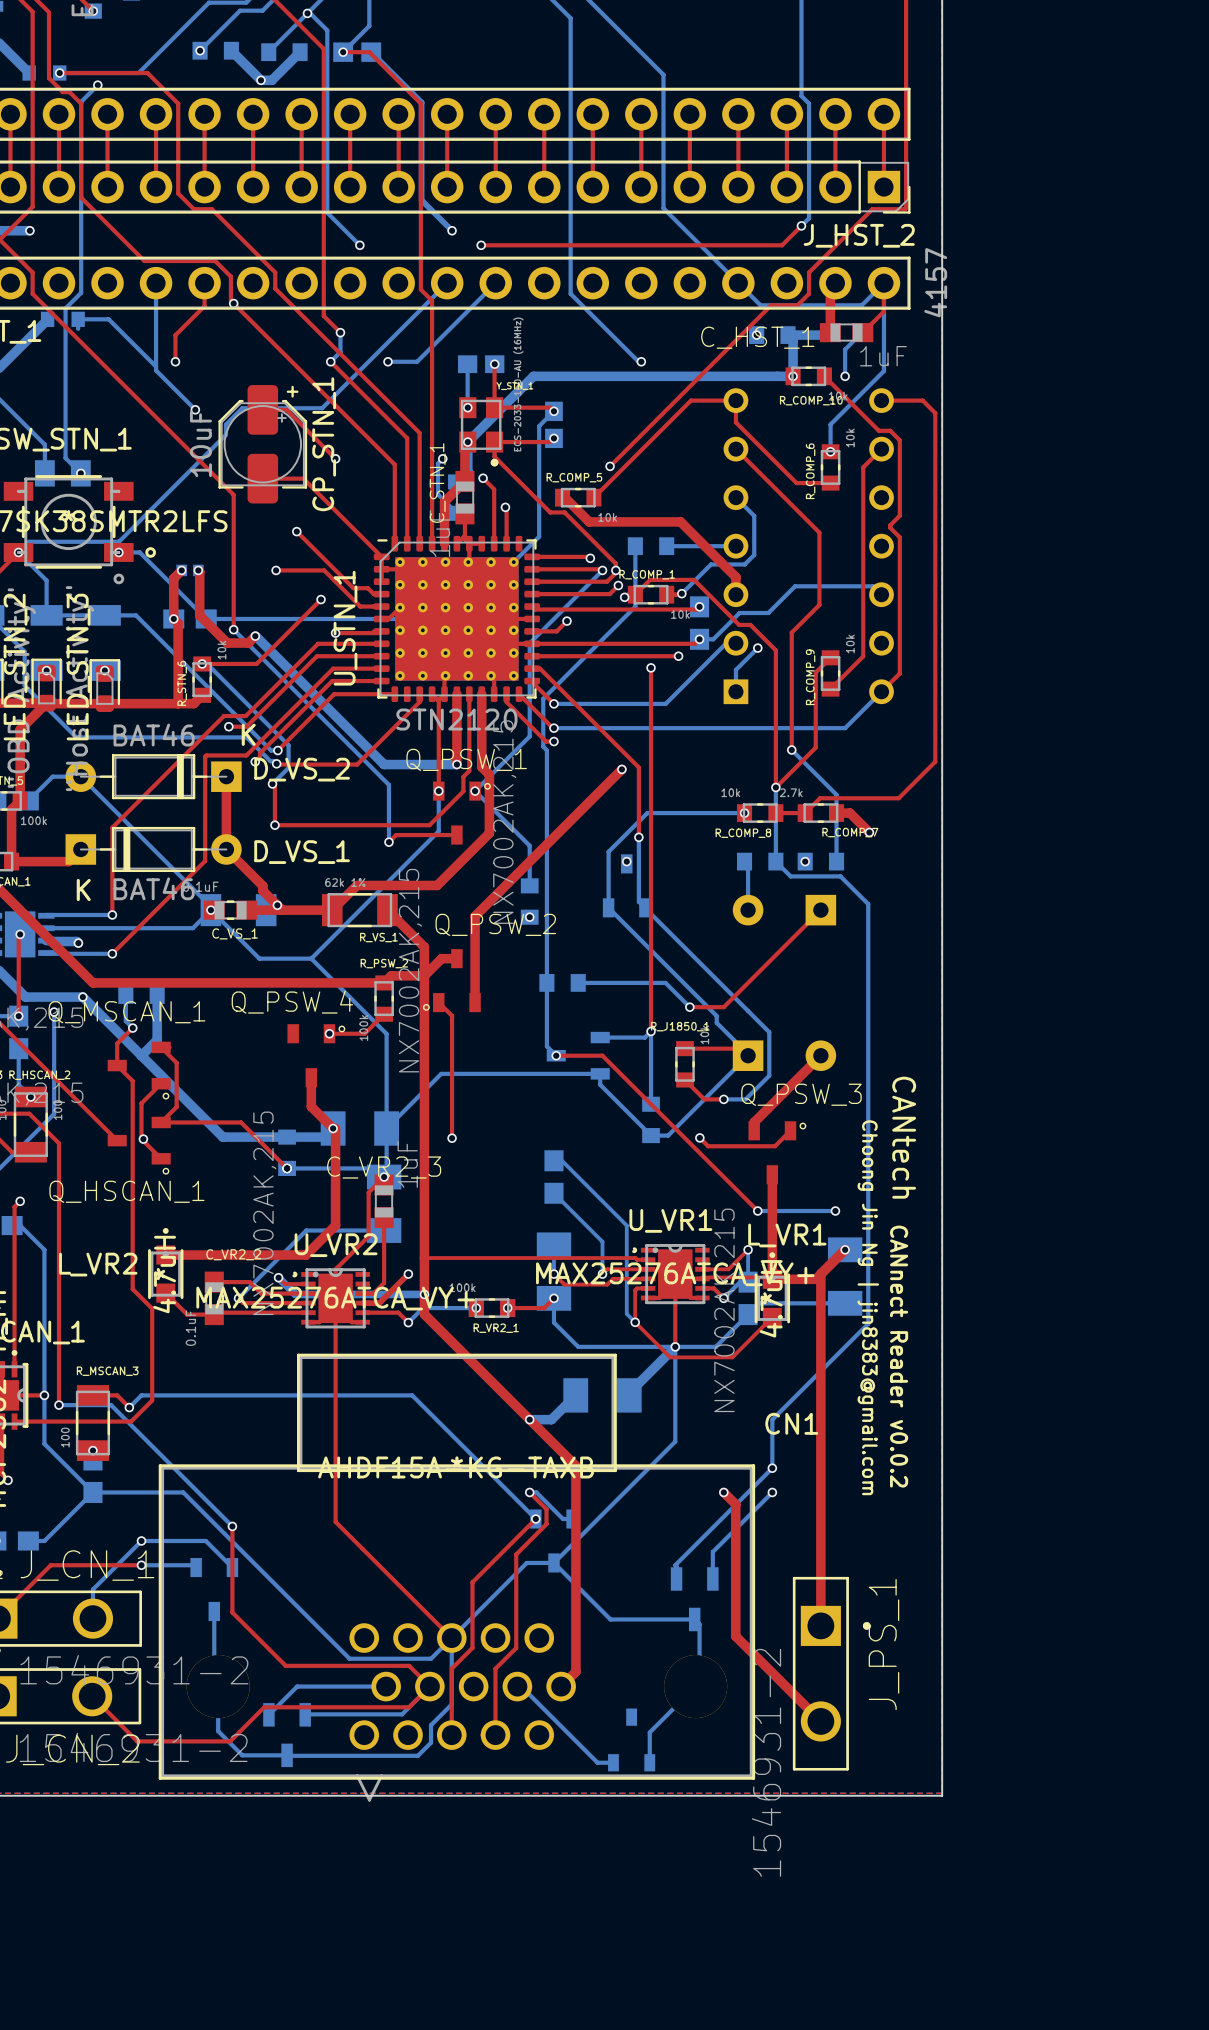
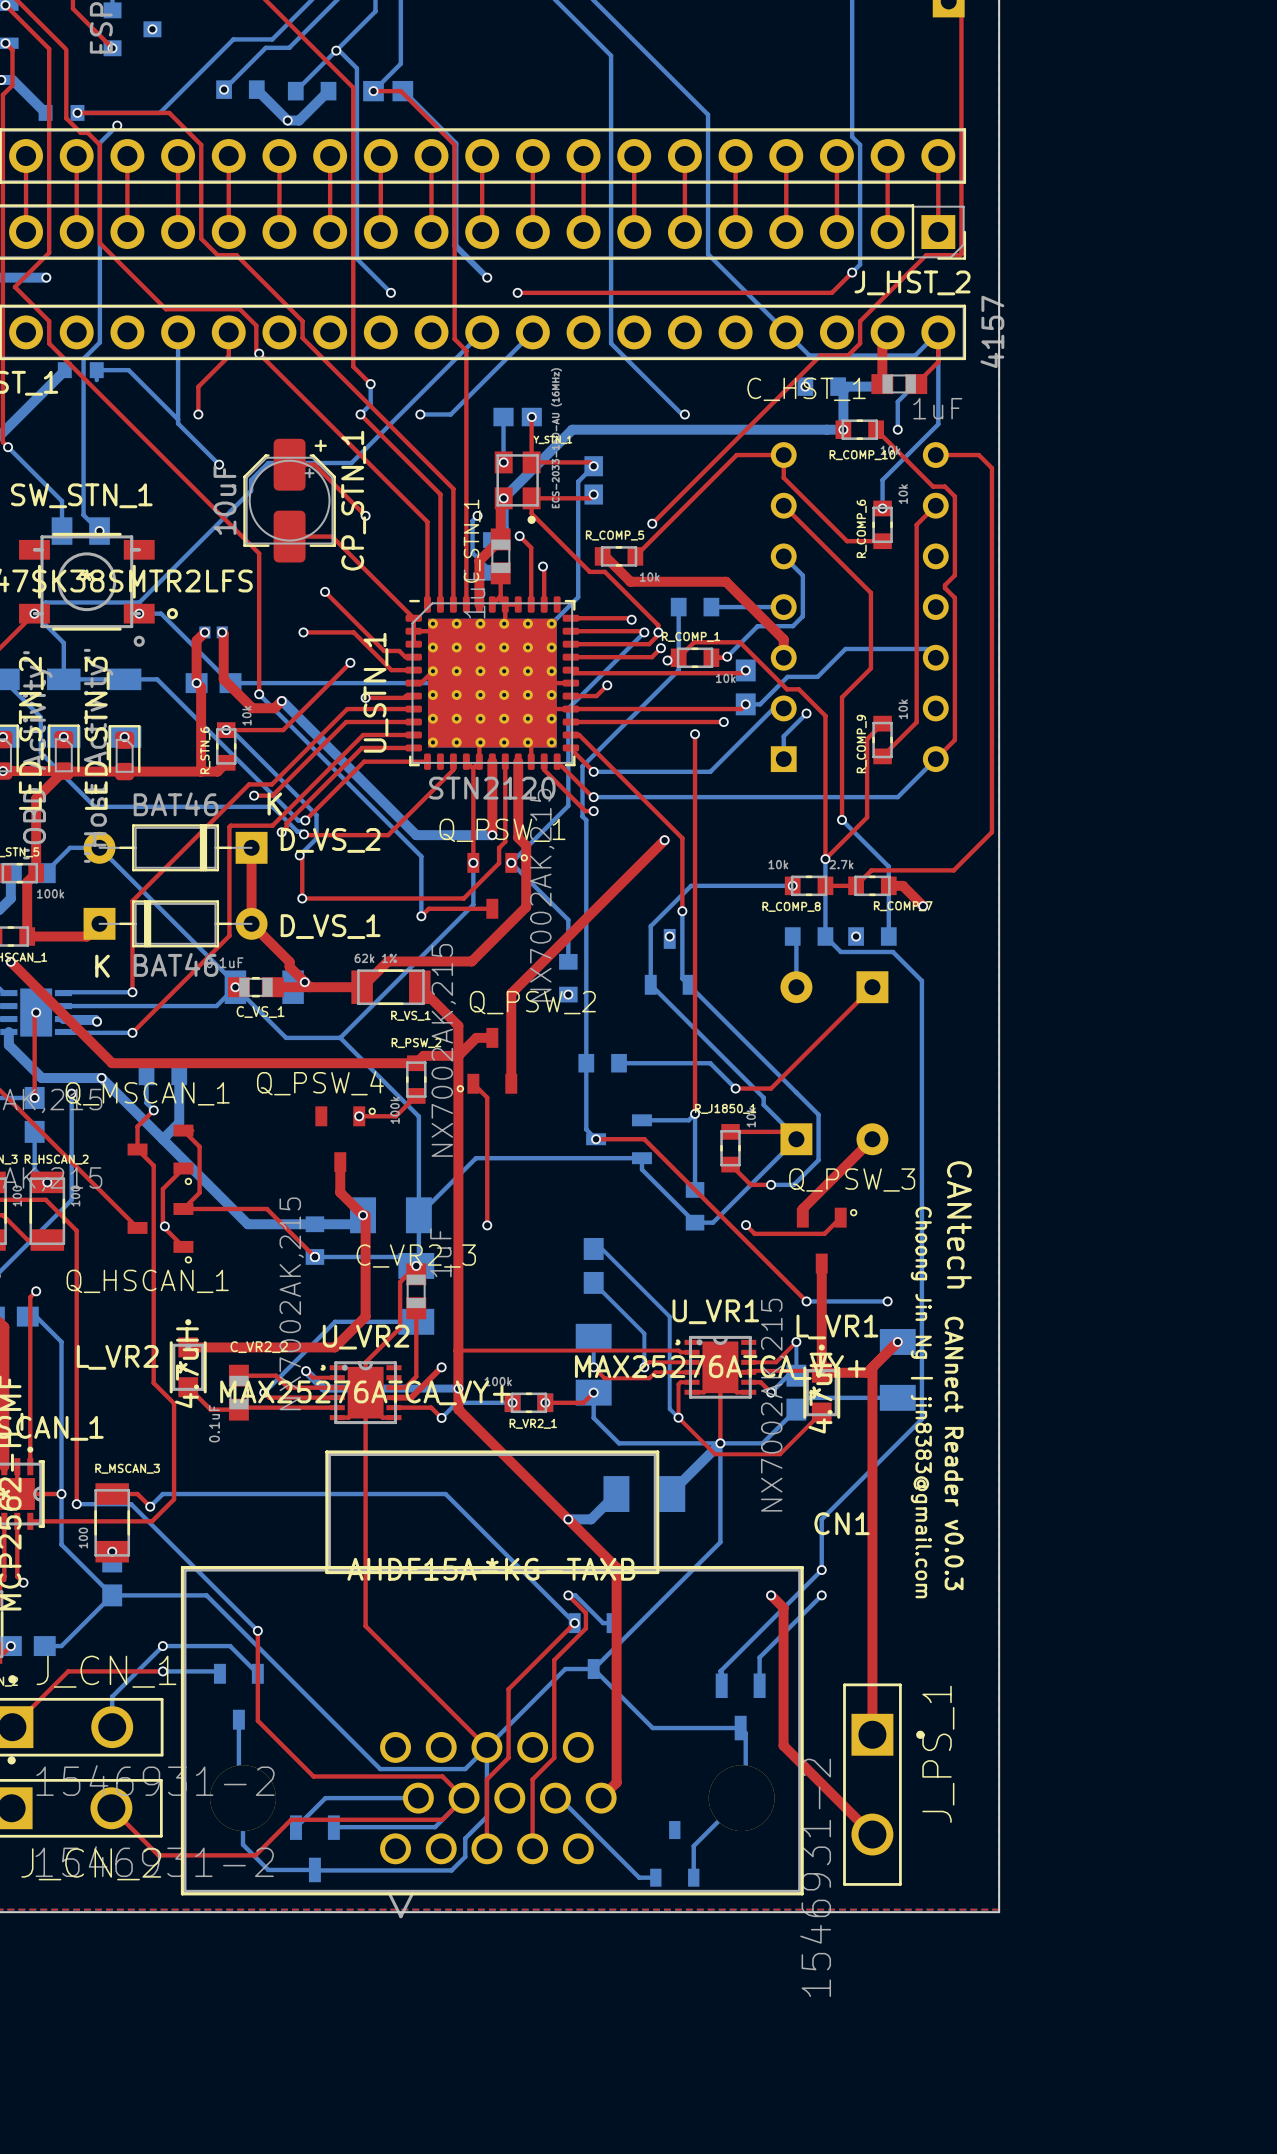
text: CANnect Reader v0.0.2 (899, 1356) -> CANnect Reader v0.0.3 (954, 1453)

